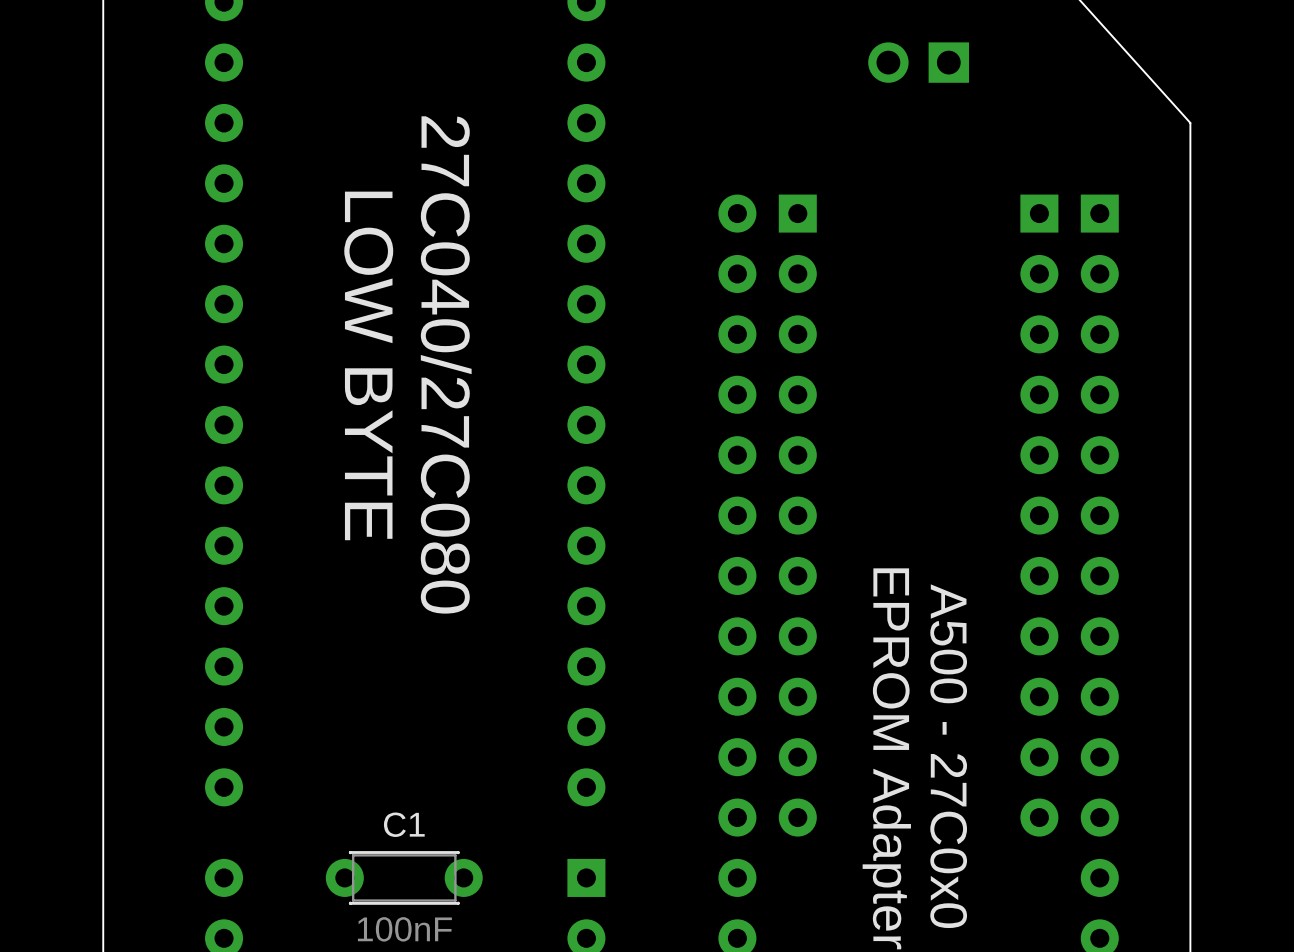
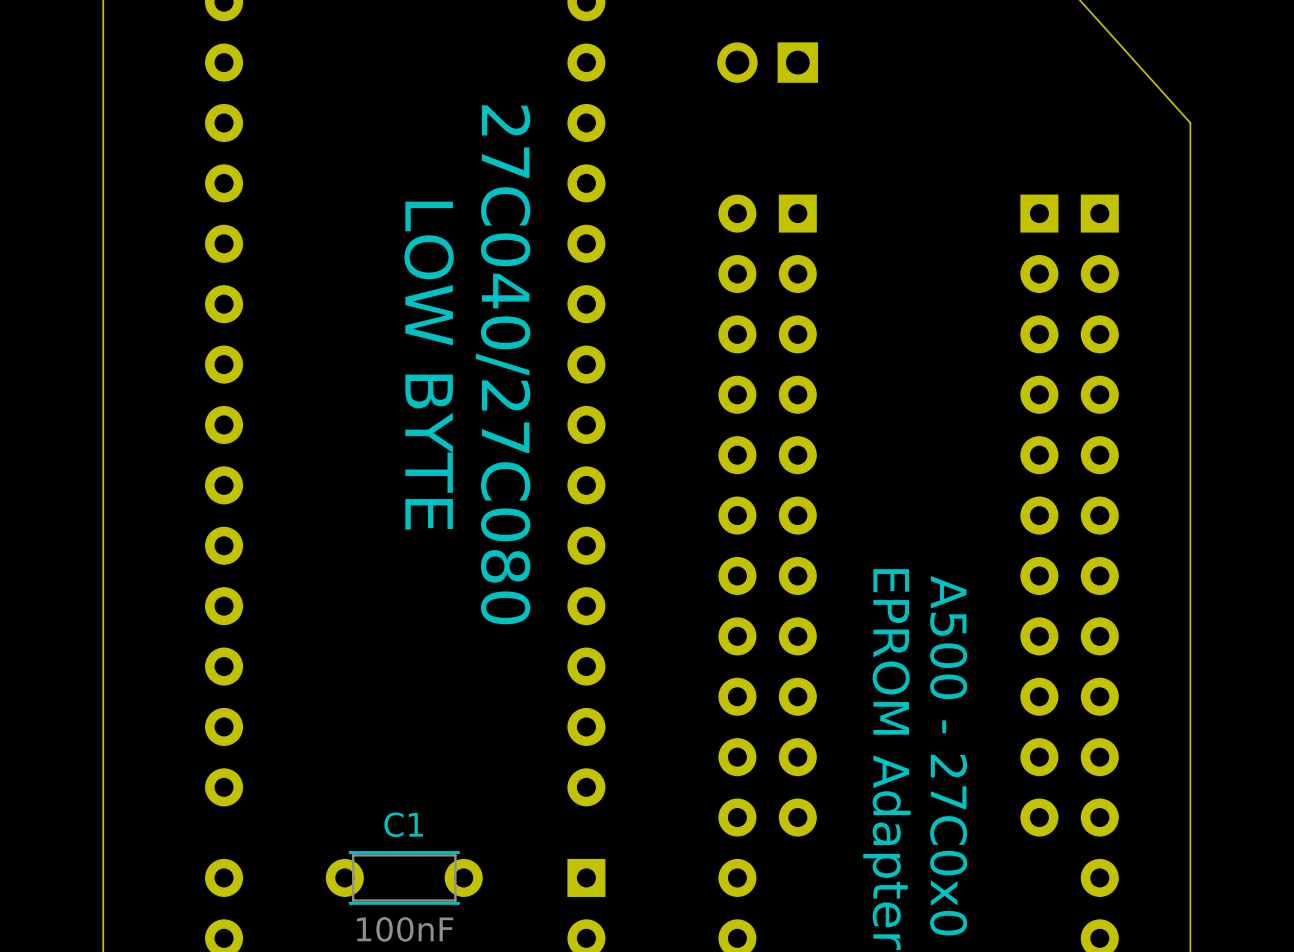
part position: (918, 62) -> (767, 62)
text position: 27C040/27C080 (446, 364) -> 27C040/27C080 (503, 364)
text position: LOW BYTE (368, 365) -> LOW BYTE (429, 365)

